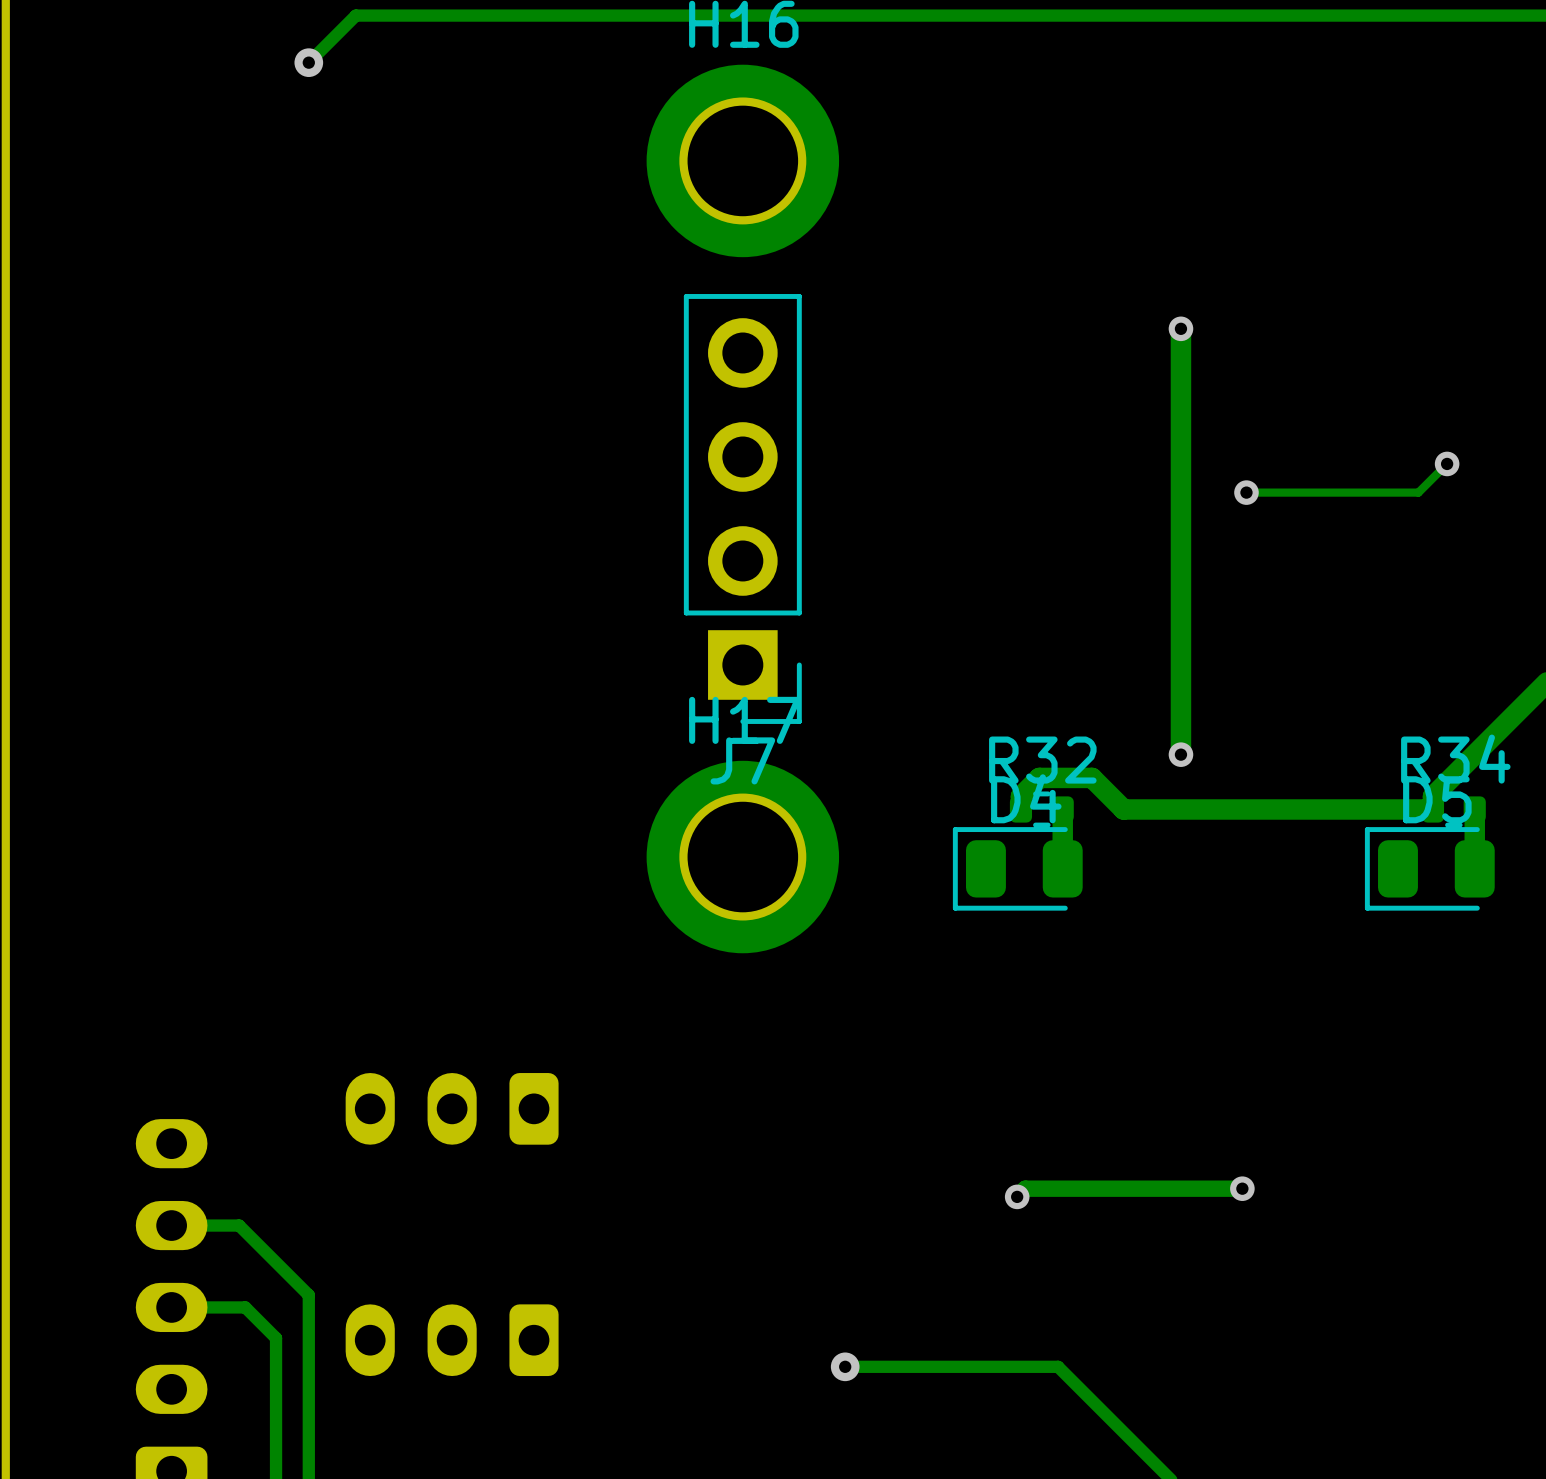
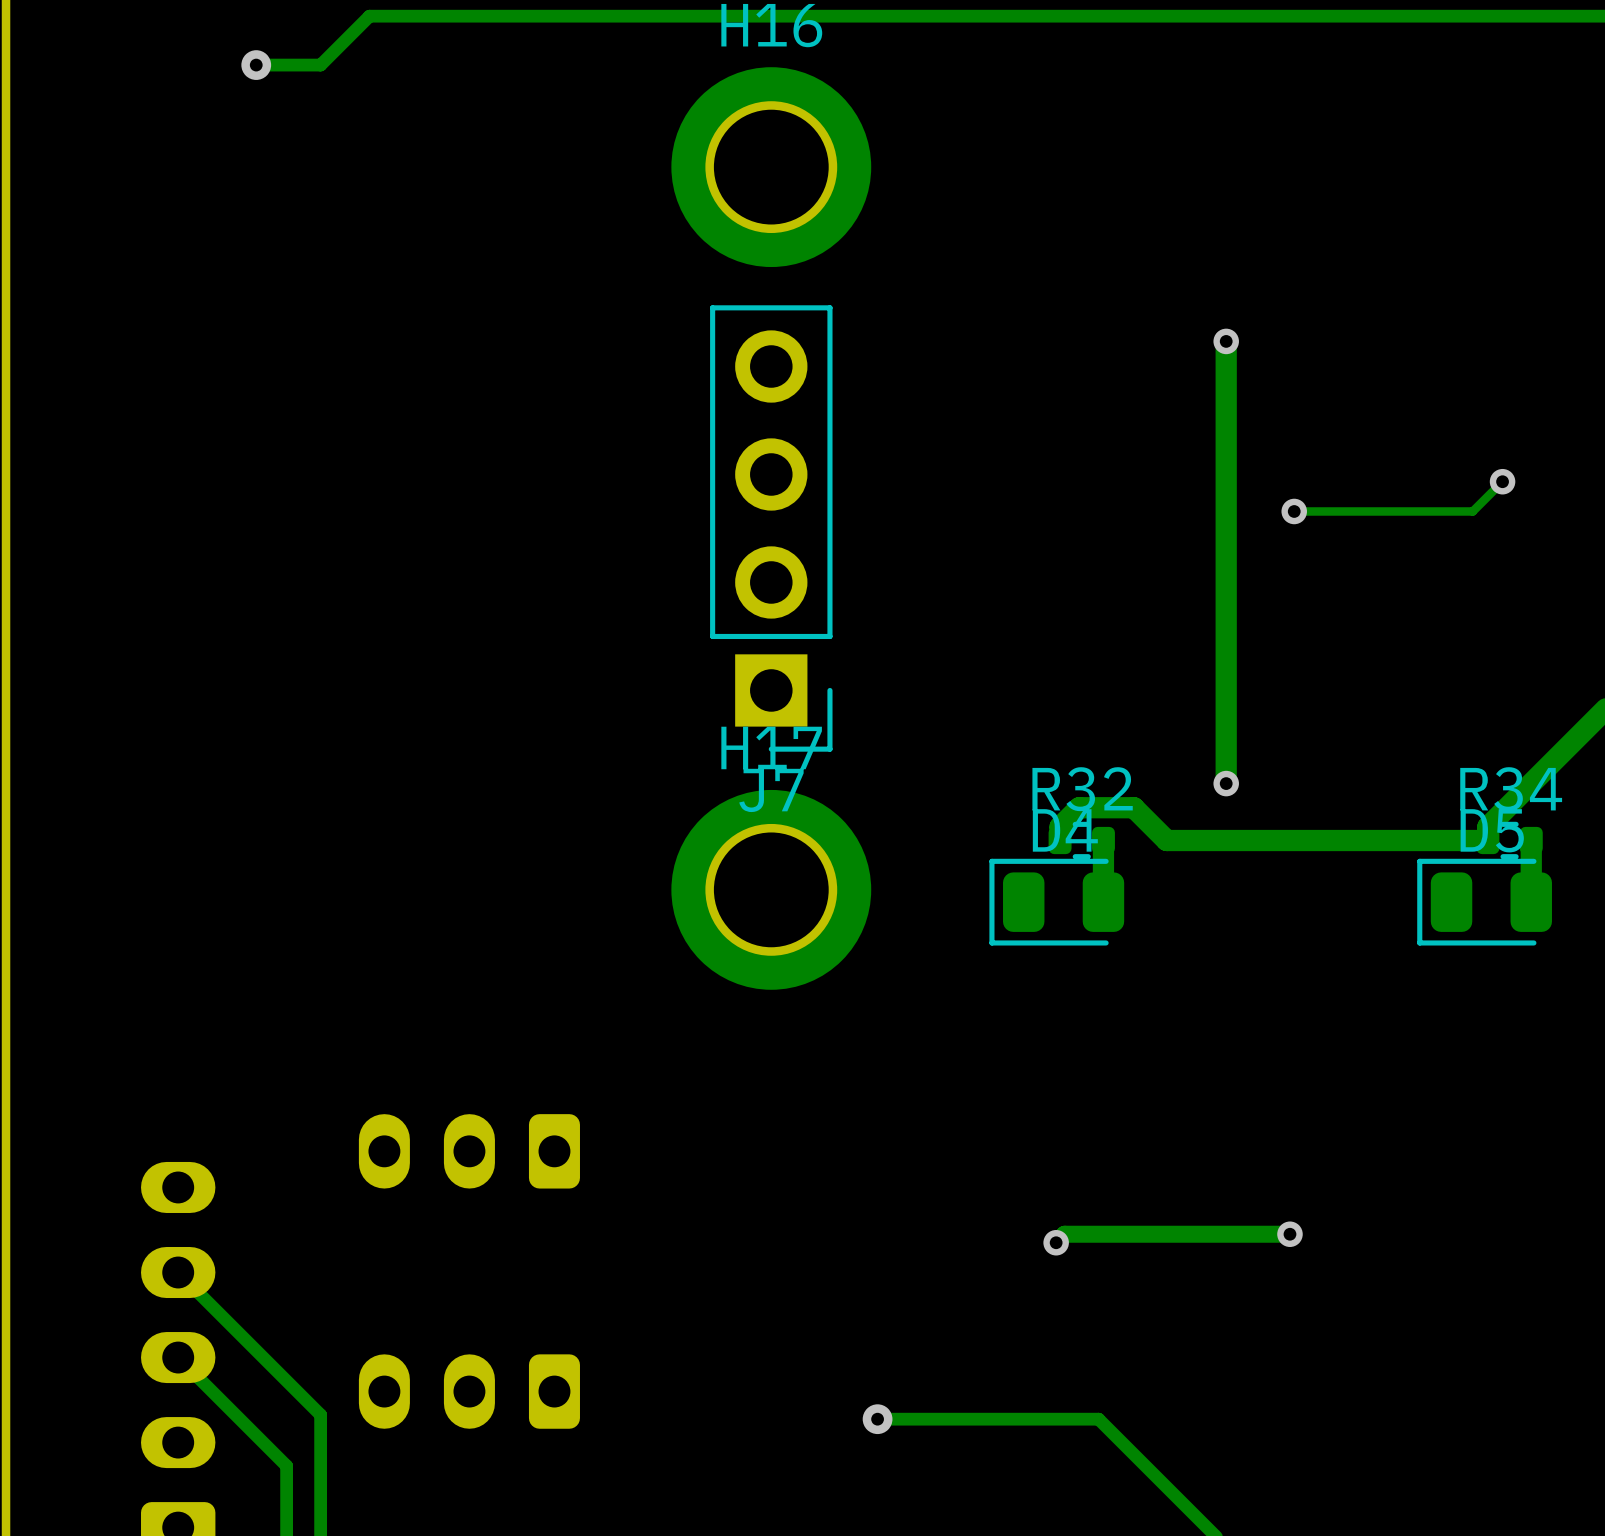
track: none -> (320, 65) (256, 65)
via position: (308, 62) -> (256, 65)
track: (171, 1225) (239, 1225) (308, 1295) (308, 1362) -> (178, 1272) (320, 1414)
track: (171, 1307) (245, 1307) (276, 1338) (276, 1411) -> (178, 1357) (286, 1465)

